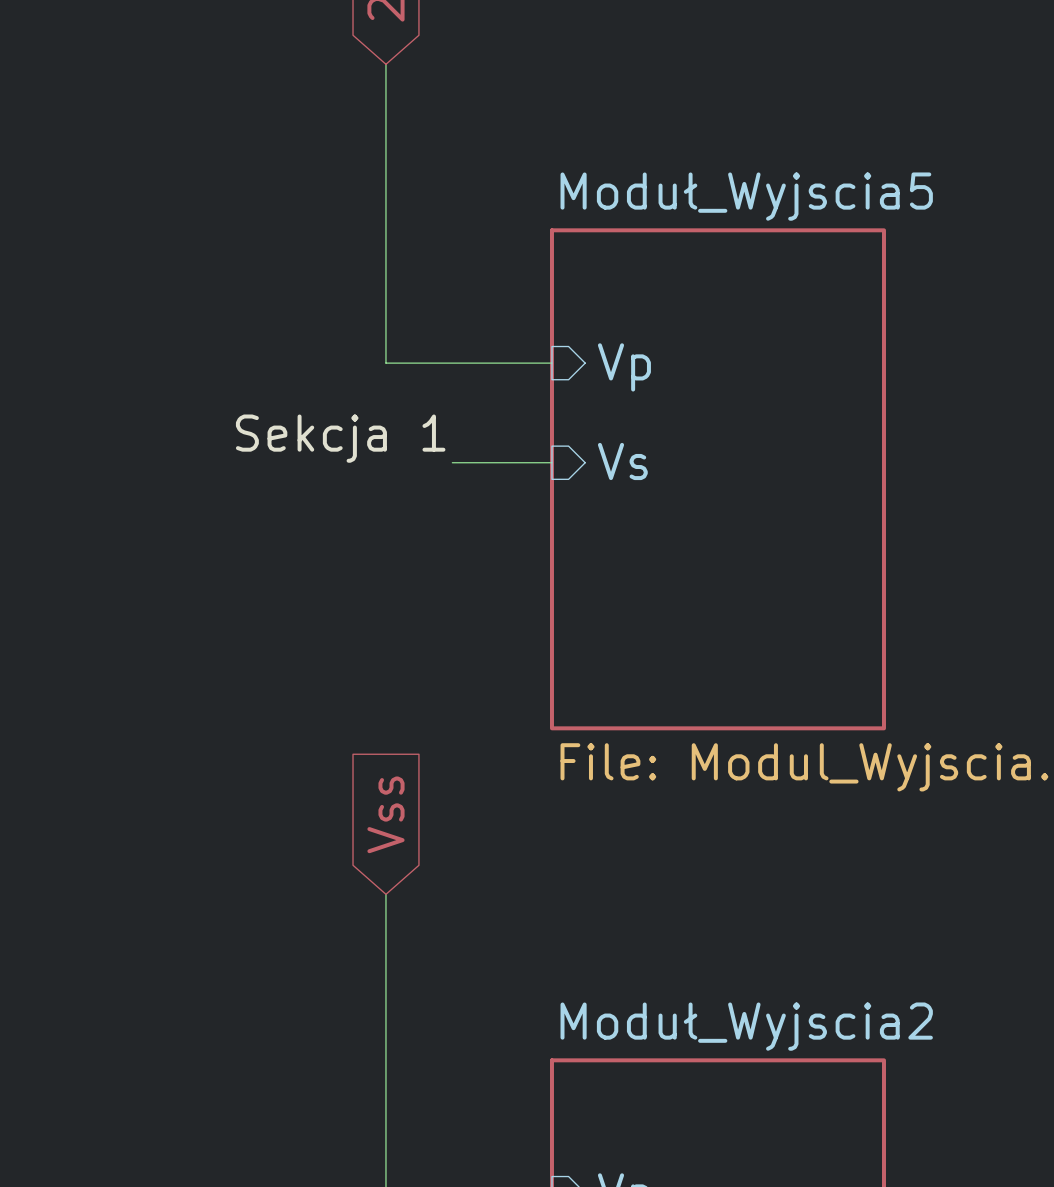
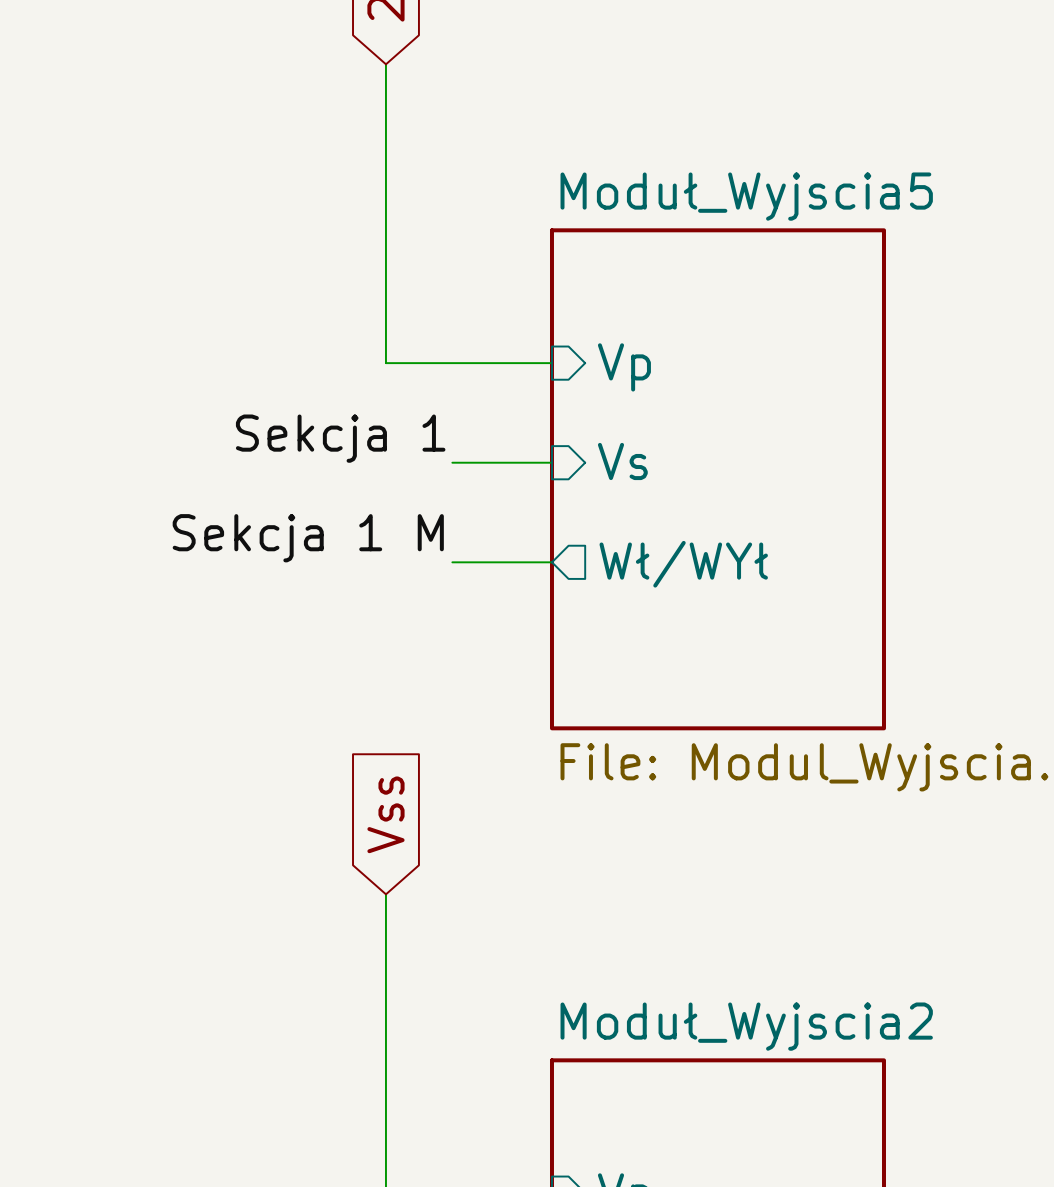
label: none -> Sekcja 1 M (308, 538)
wire: none -> (452, 562) (551, 562)
sheet pin: none -> Wł/WYł (683, 564)

